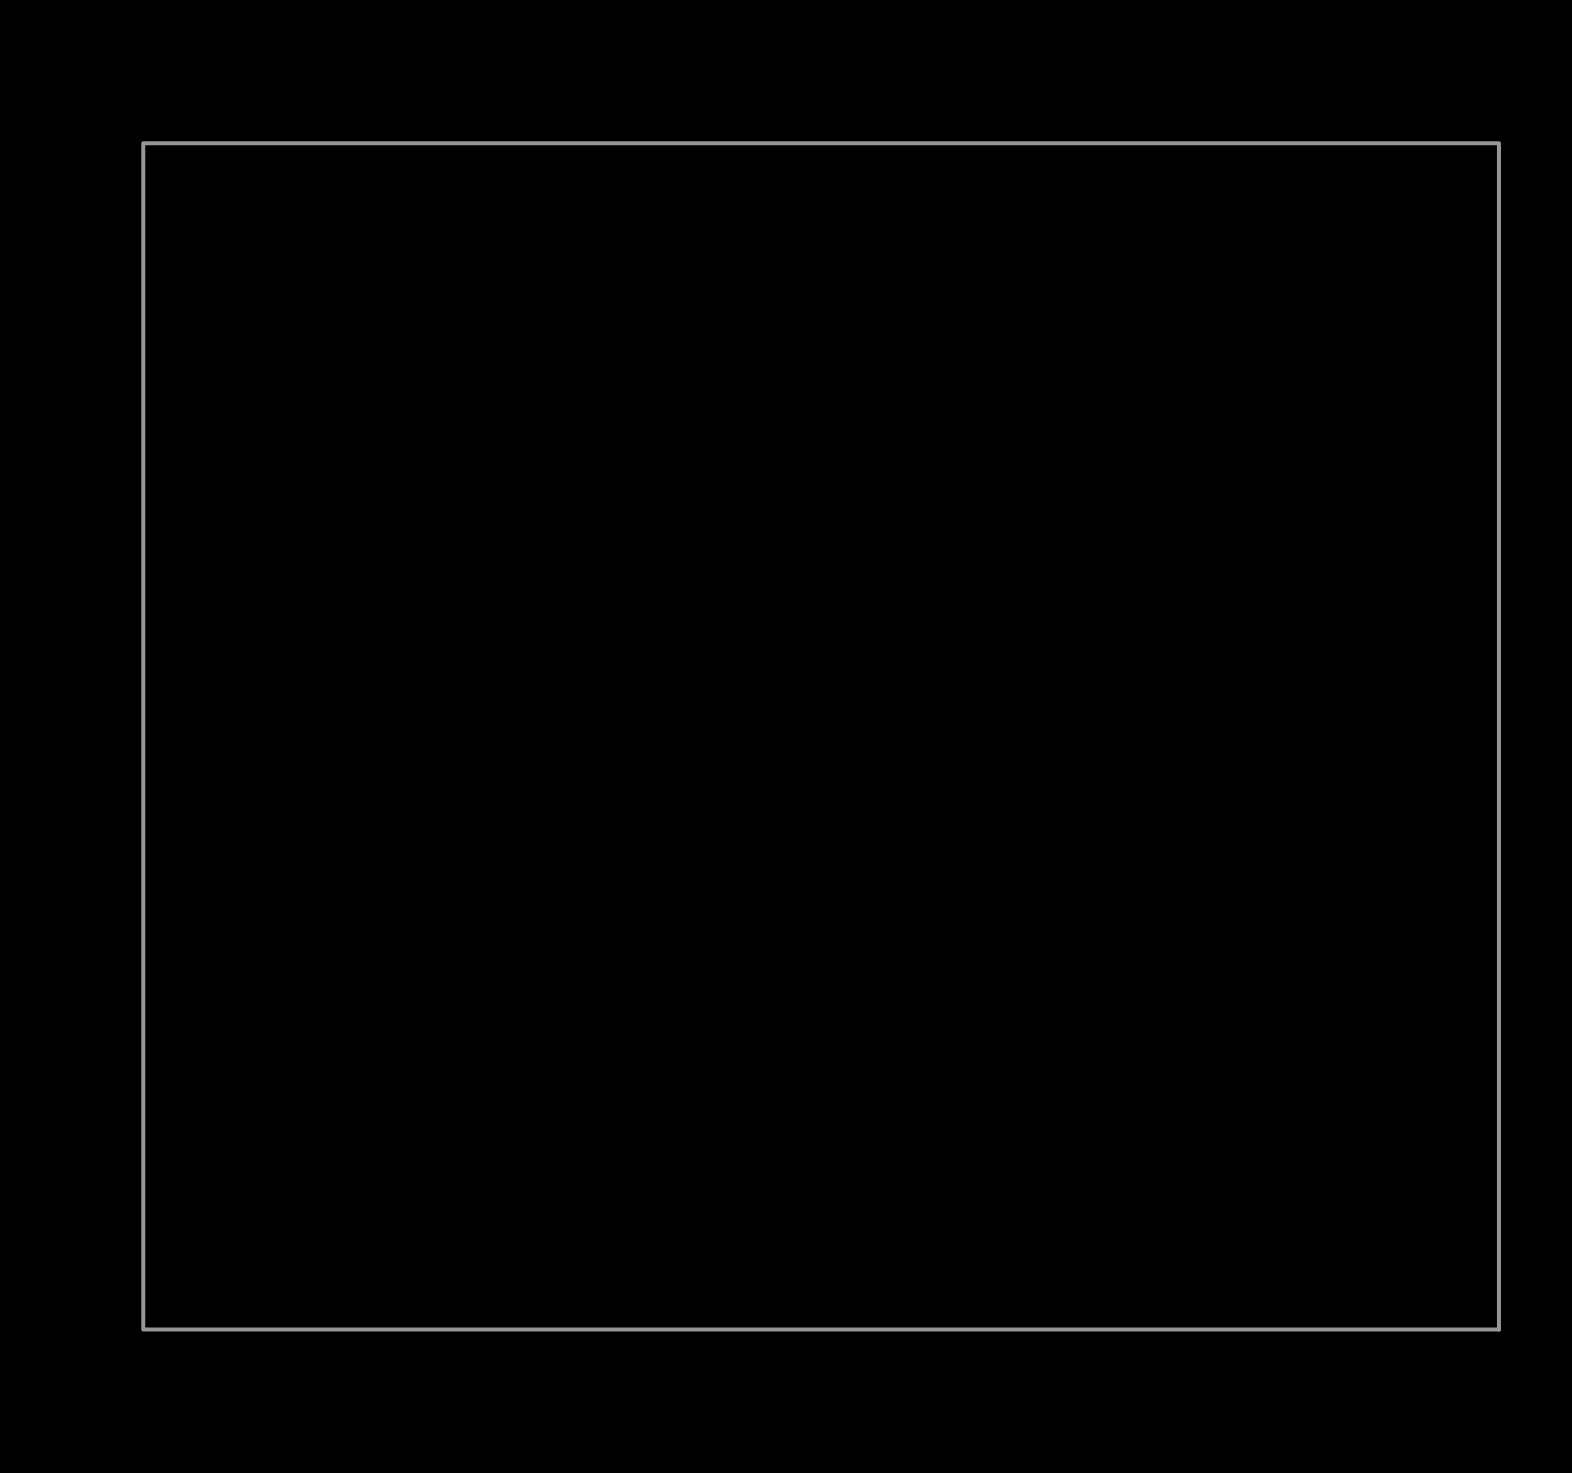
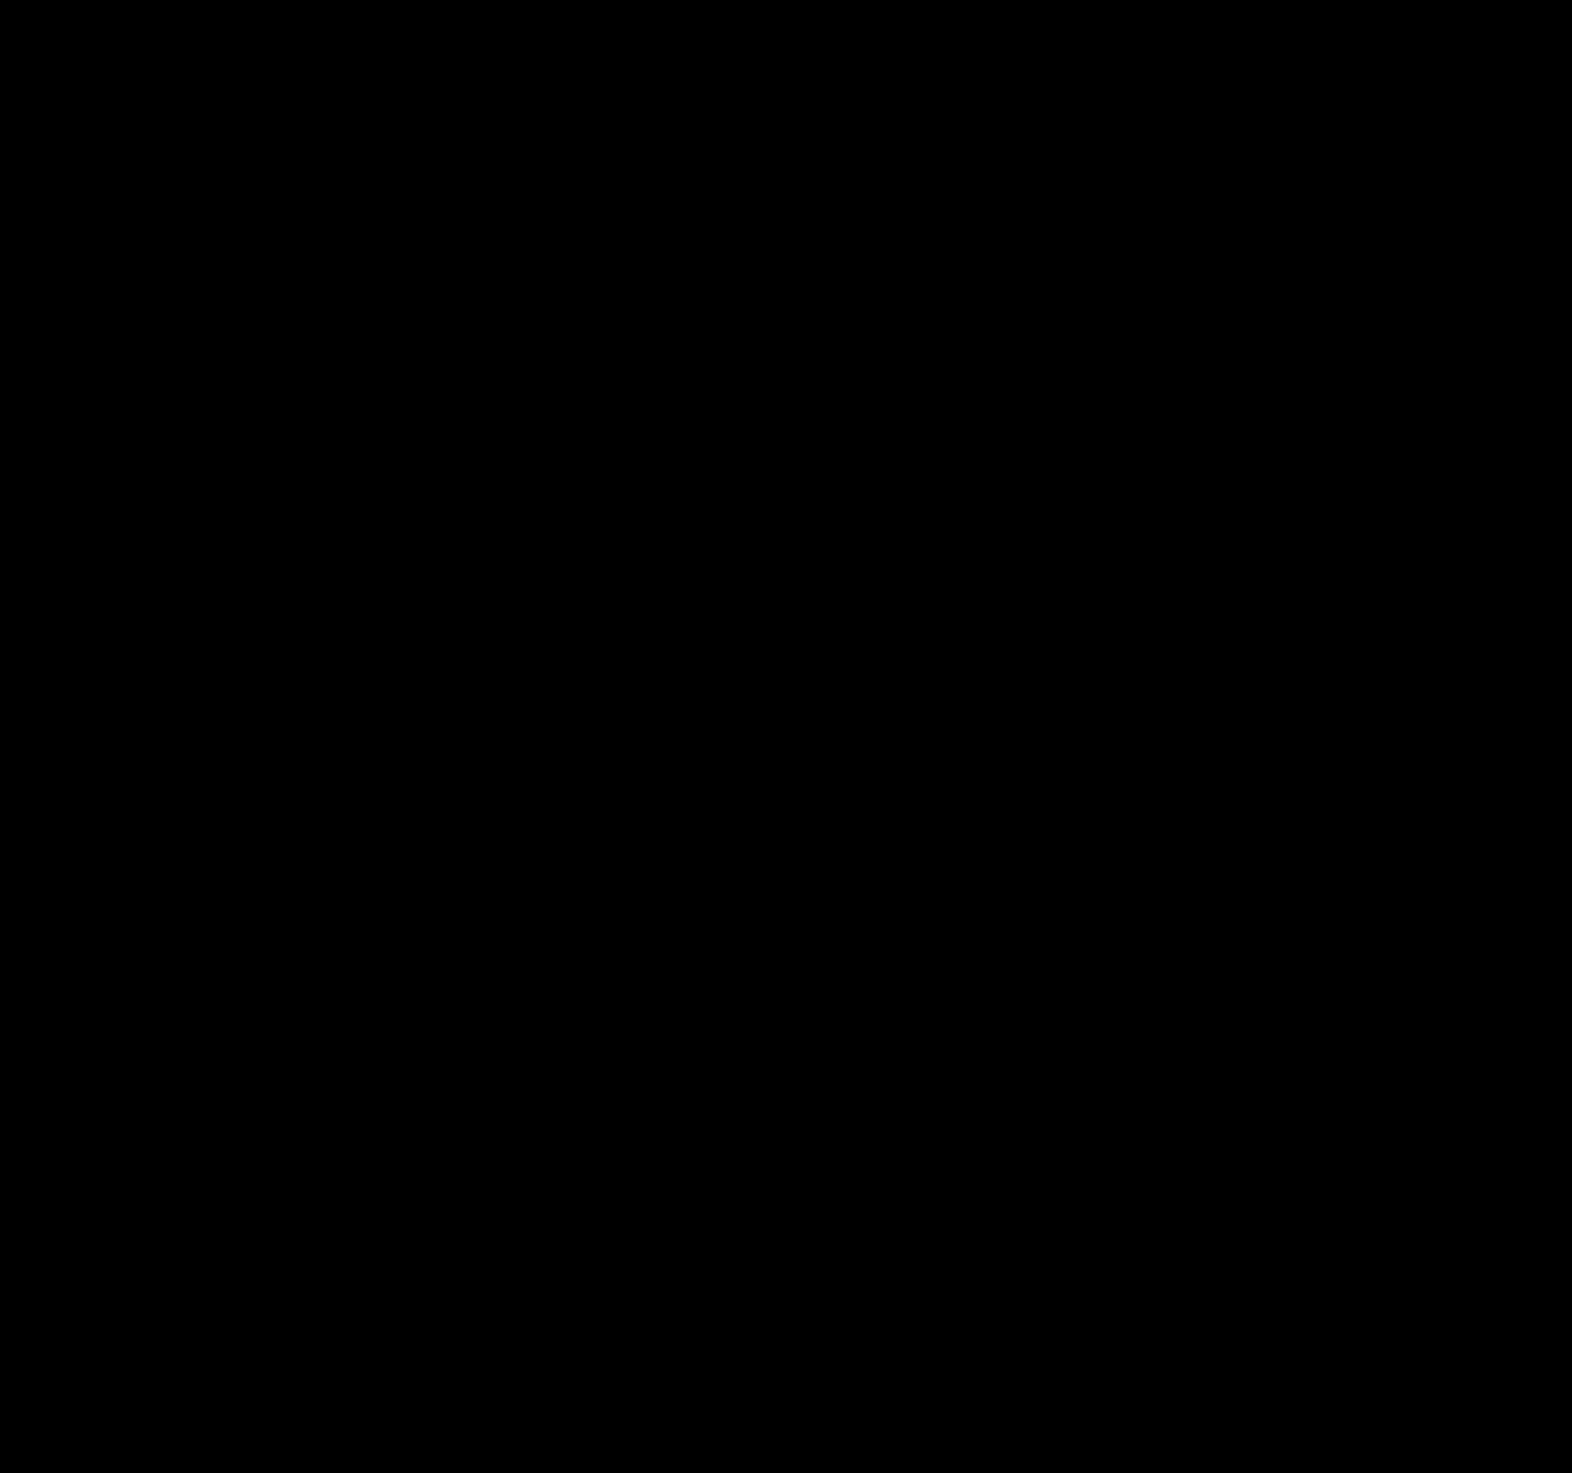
drawing: [141, 141, 1501, 1332] -> none

